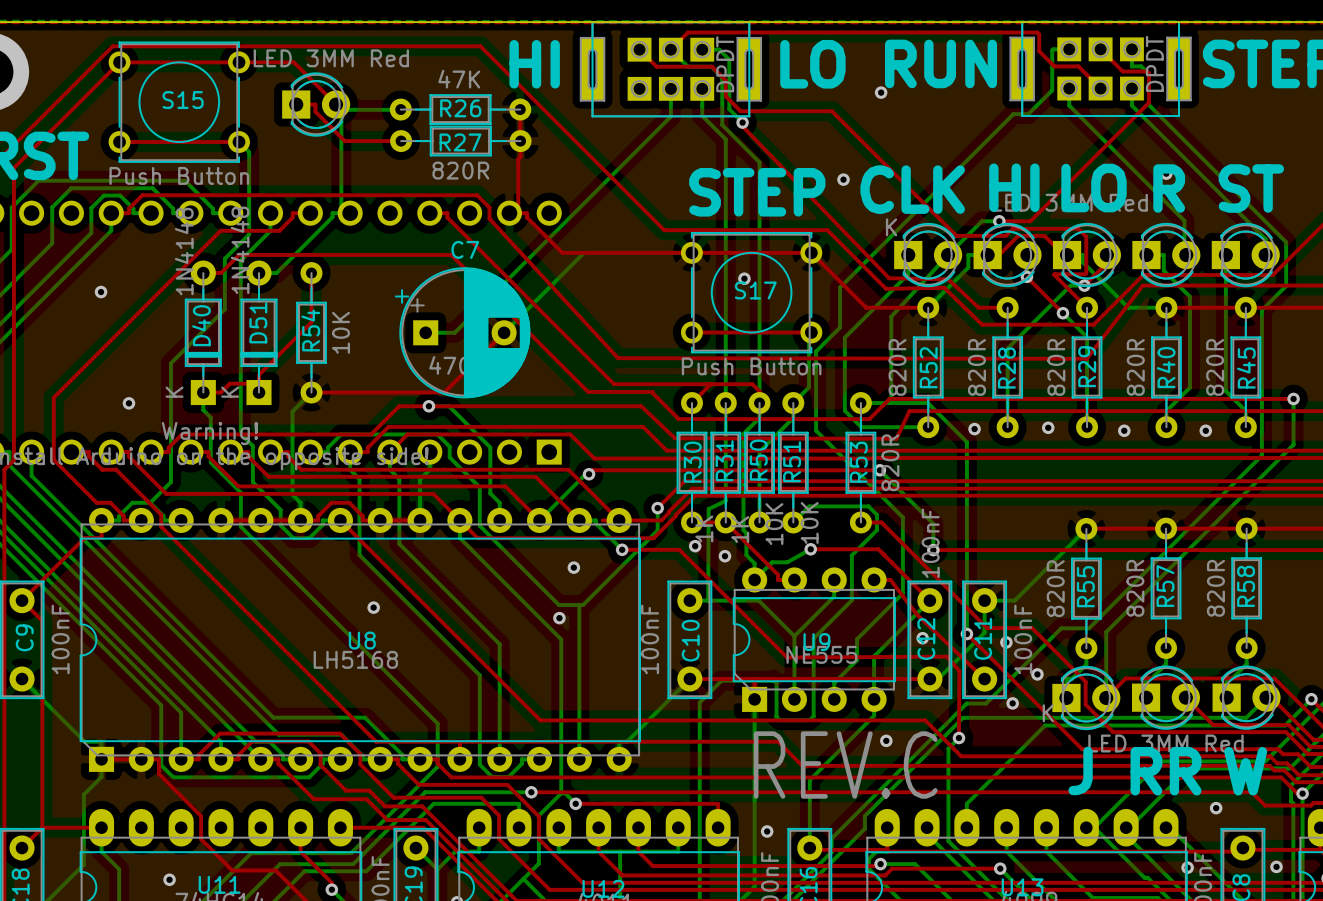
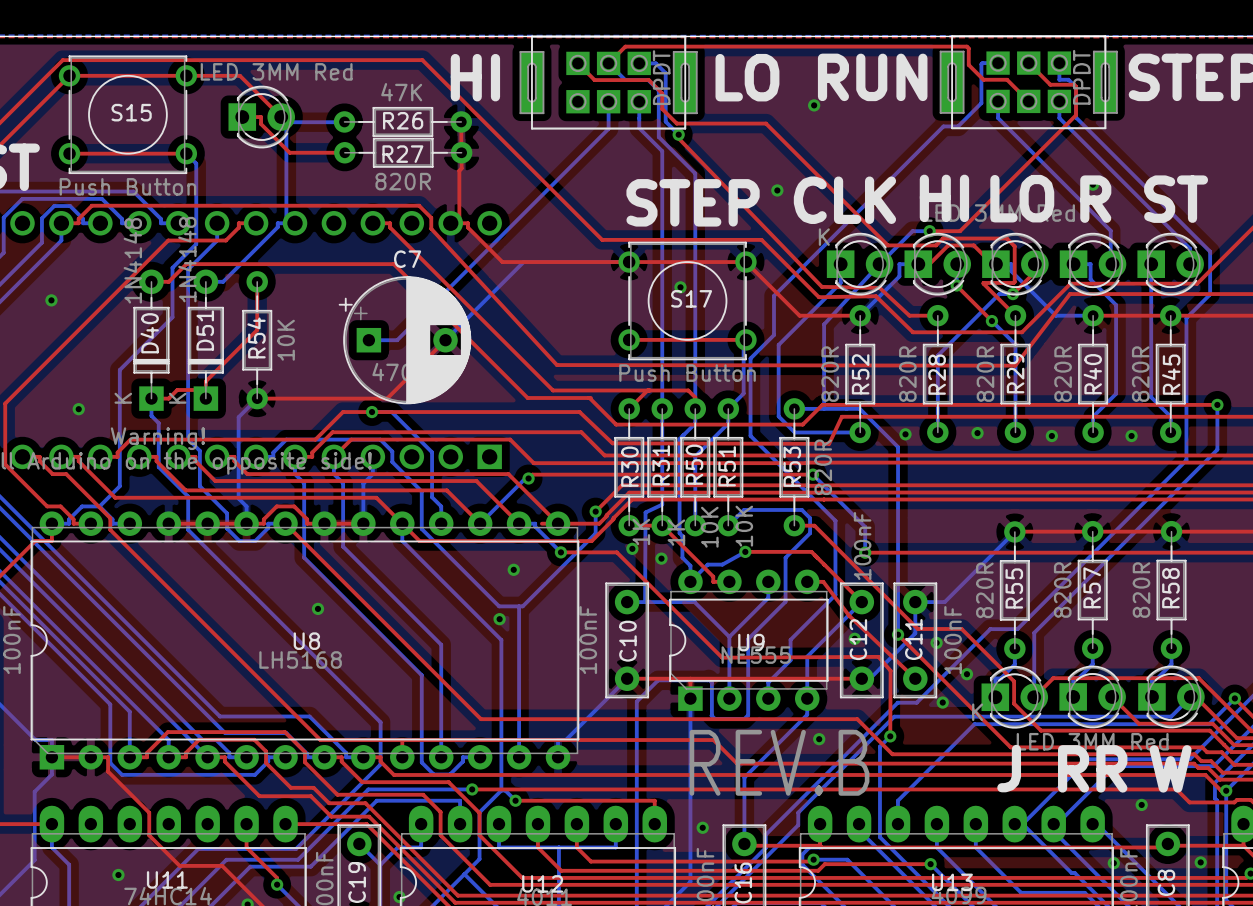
text: REV.C (845, 765) -> REV.B (779, 762)

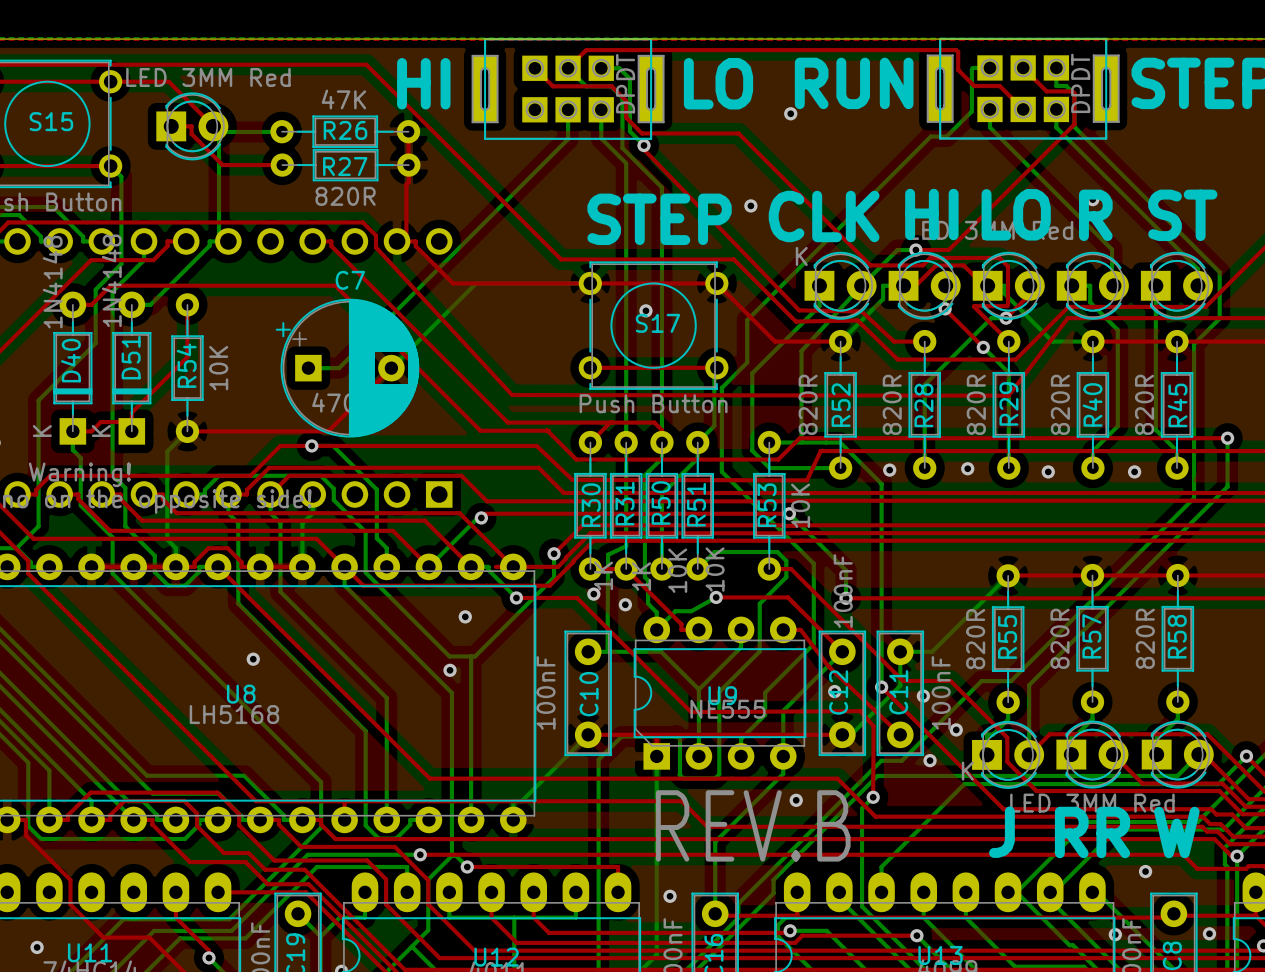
R53 value: 820R (823, 467) -> 10K (800, 505)

